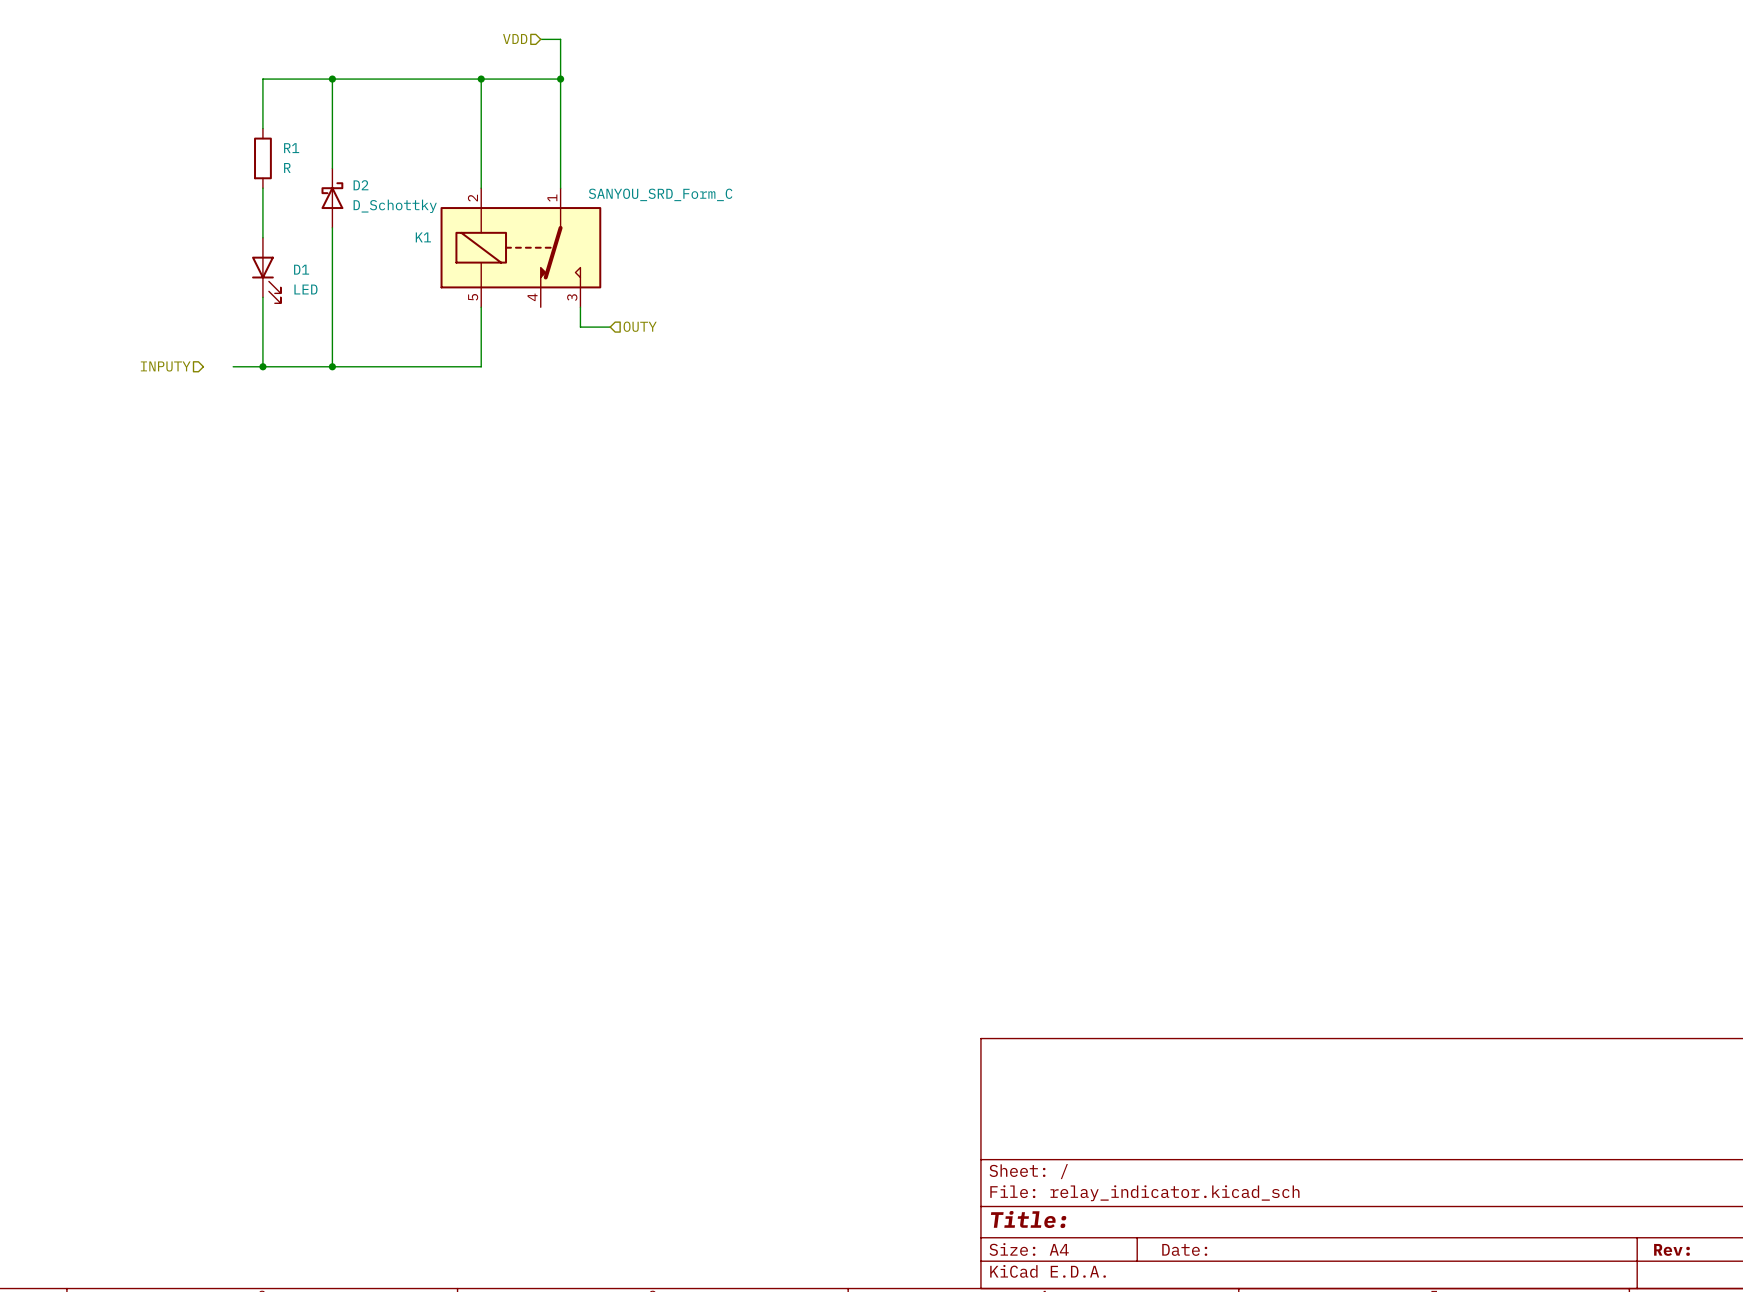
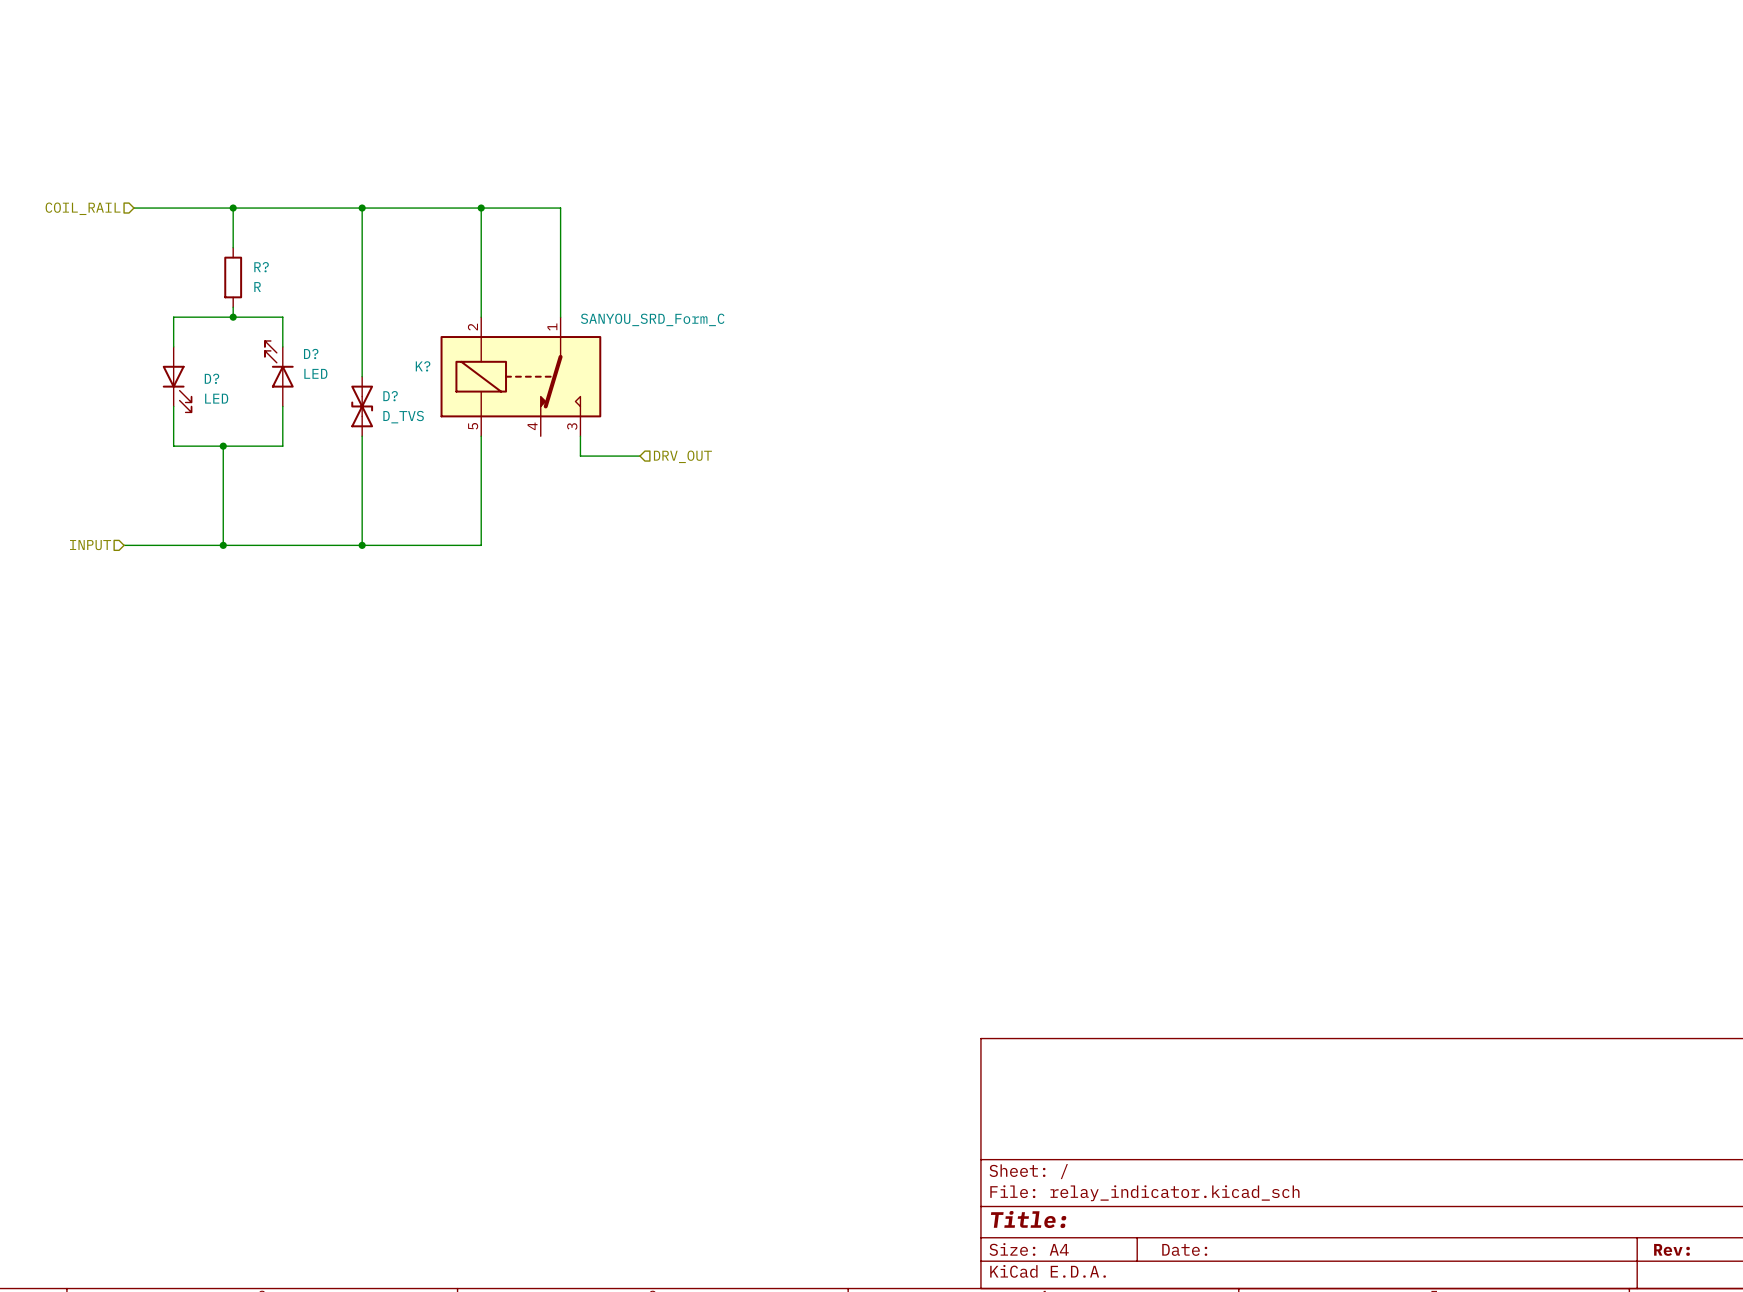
hierarchical label: VDD (515, 39) -> none
wire: (540, 39) (560, 39) (560, 188) -> none
wire: (332, 79) (332, 168) -> none
junction: (332, 79) -> none
wire: (481, 79) (481, 188) -> none
junction: (481, 79) -> none
wire: (560, 79) (262, 79) (262, 128) -> none
junction: (560, 79) -> none
R1: R (262, 158) -> none
wire: (262, 188) (262, 237) -> none
D2: D_Schottky (332, 198) -> none
hierarchical label: none -> COIL_RAIL (83, 208)
wire: none -> (133, 208) (560, 208) (560, 317)
wire: none -> (233, 208) (233, 247)
junction: none -> (233, 208)
wire: none -> (362, 208) (362, 376)
junction: none -> (362, 208)
junction: none -> (481, 208)
wire: (332, 227) (332, 366) -> none
K1: SANYOU_SRD_Form_C (520, 247) -> none
D1: LED (266, 270) -> none
R?: none -> R (233, 277)
wire: (262, 297) (262, 366) -> none
wire: none -> (233, 307) (233, 317)
wire: (580, 307) (580, 327) (610, 327) -> none
junction: none -> (233, 317)
wire: (481, 317) (481, 366) (233, 366) -> none
hierarchical label: OUTY (640, 326) -> none
wire: none -> (173, 346) (173, 317) (282, 317) (282, 346)
hierarchical label: INPUTY (165, 366) -> none
junction: (262, 366) -> none
junction: (332, 366) -> none
D?: none -> LED (279, 373)
K?: none -> SANYOU_SRD_Form_C (520, 376)
D?: none -> LED (177, 379)
wire: none -> (173, 406) (173, 446) (282, 446) (282, 406)
D?: none -> D_TVS (362, 406)
wire: none -> (362, 436) (362, 545)
wire: none -> (481, 436) (481, 545) (124, 545)
wire: none -> (580, 436) (580, 456) (639, 456)
wire: none -> (223, 446) (223, 545)
junction: none -> (223, 446)
hierarchical label: none -> DRV_OUT (682, 456)
hierarchical label: none -> INPUT (90, 545)
junction: none -> (223, 545)
junction: none -> (362, 545)

